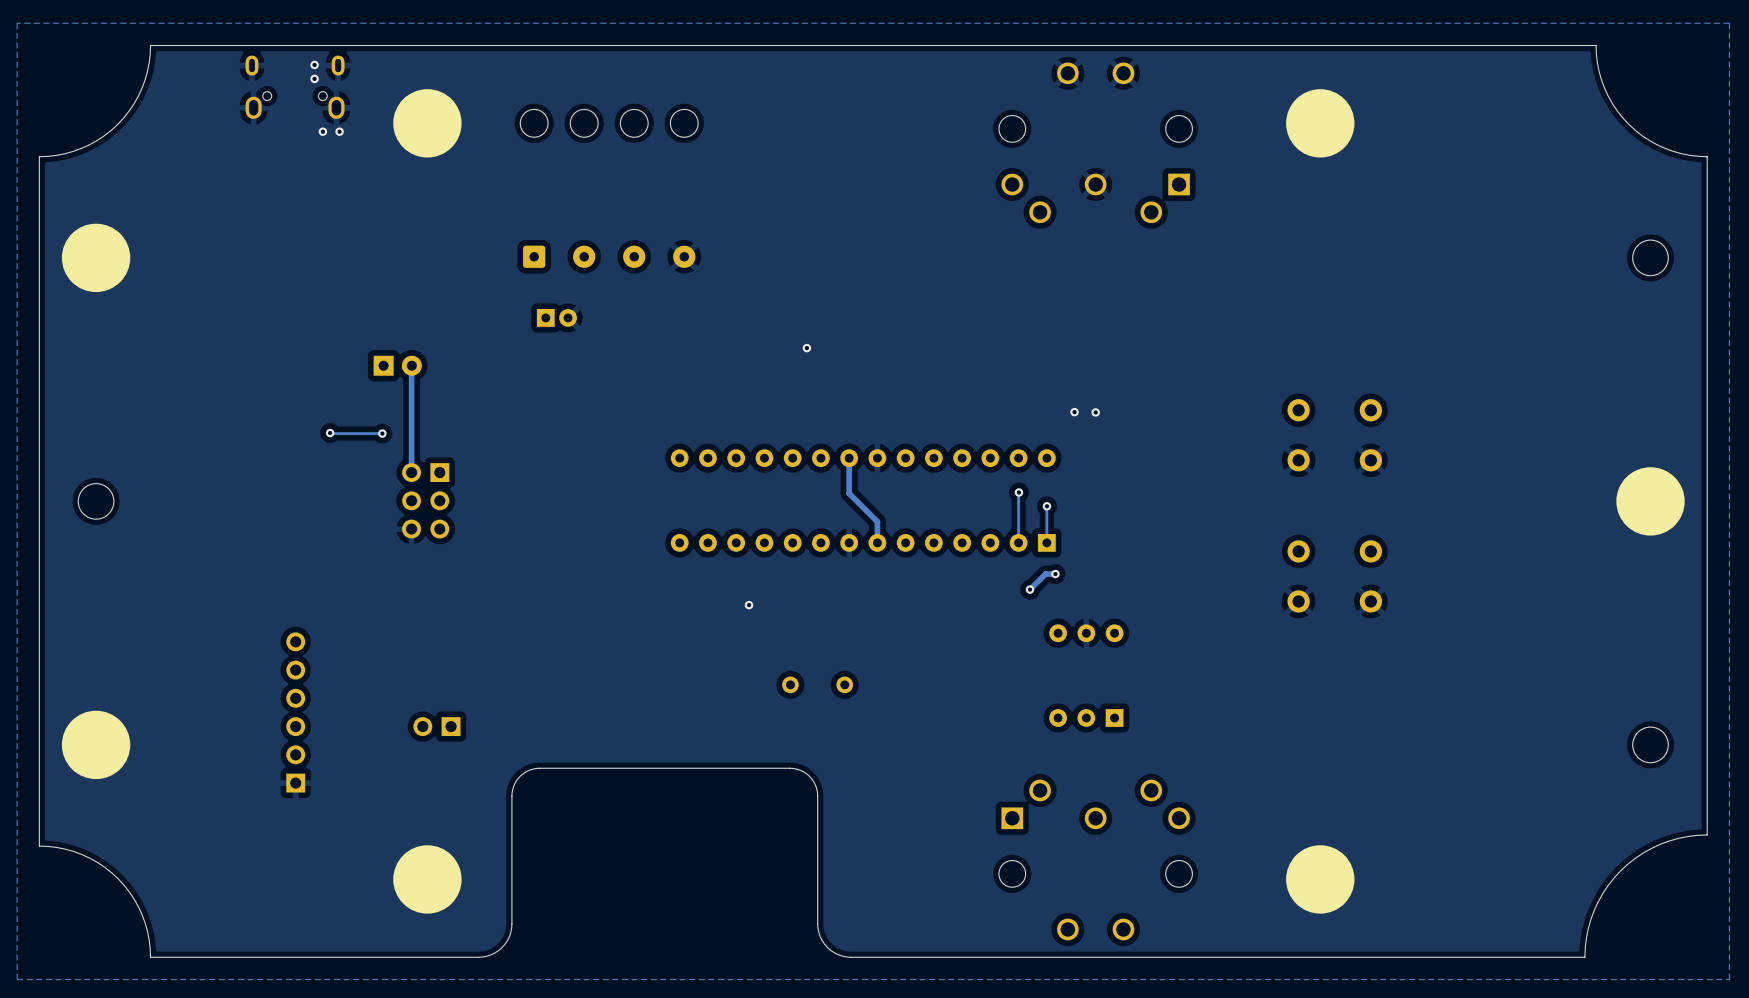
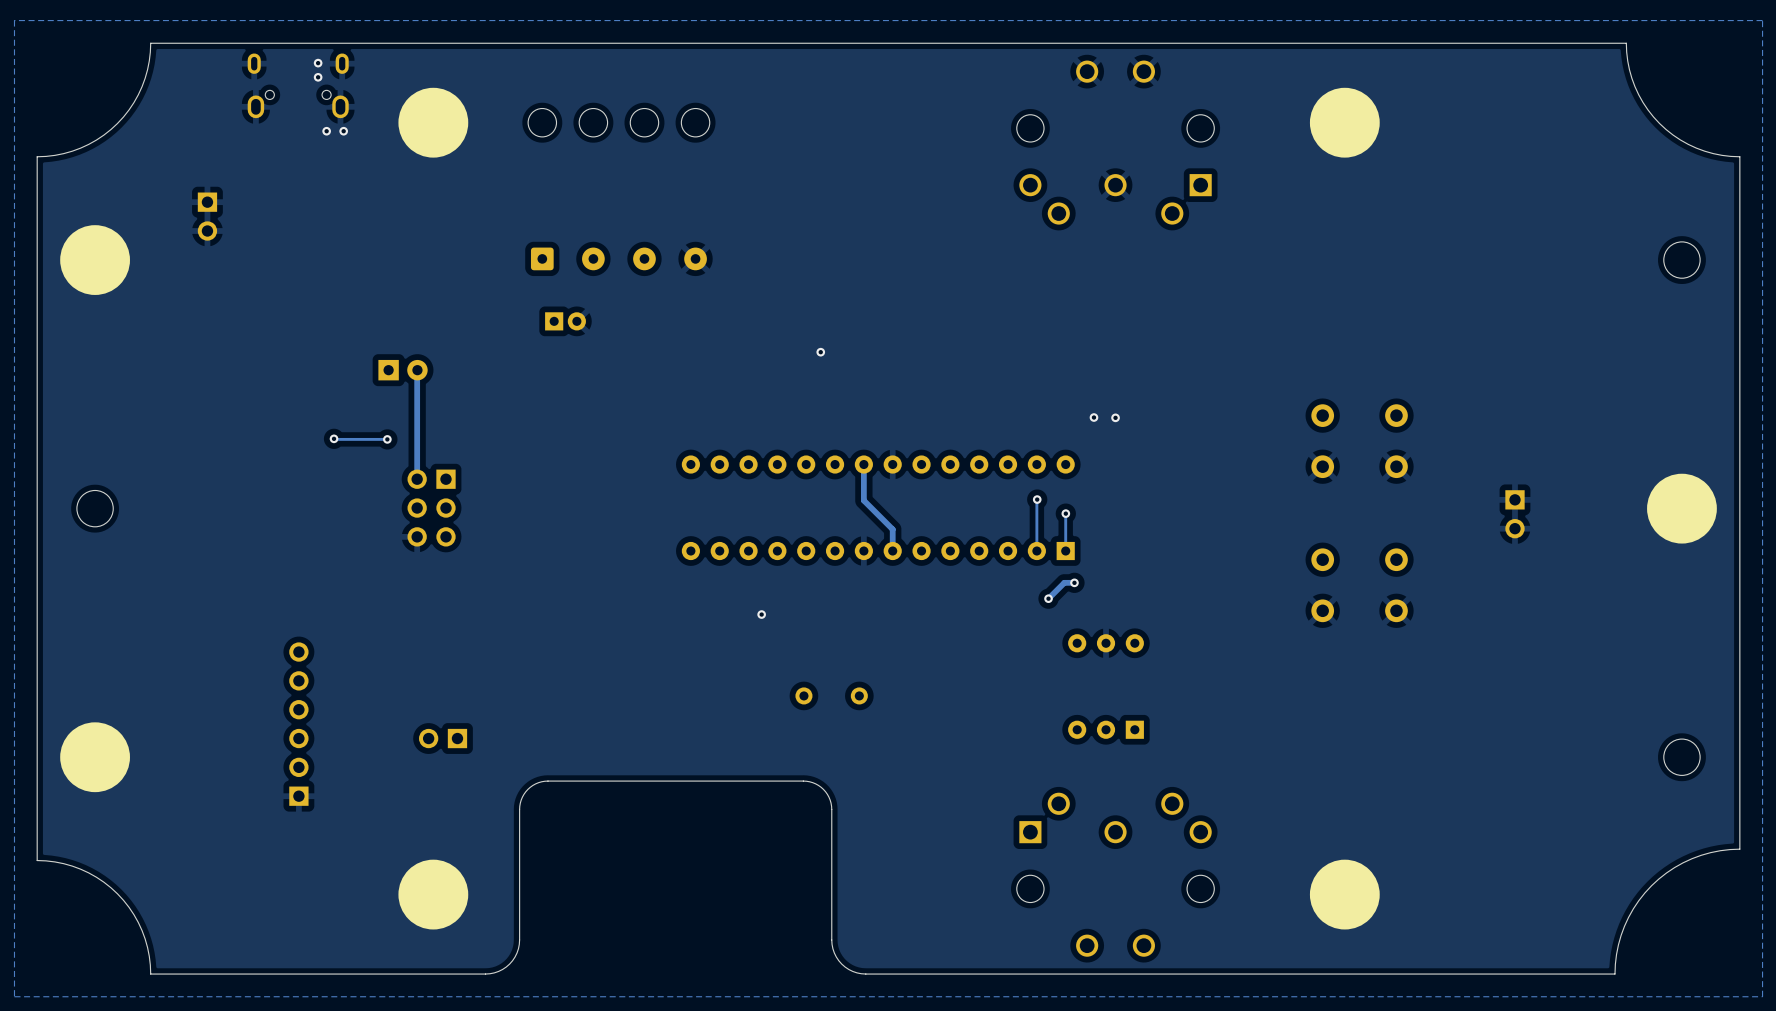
part: none -> (207, 216)
part: none -> (1515, 514)

